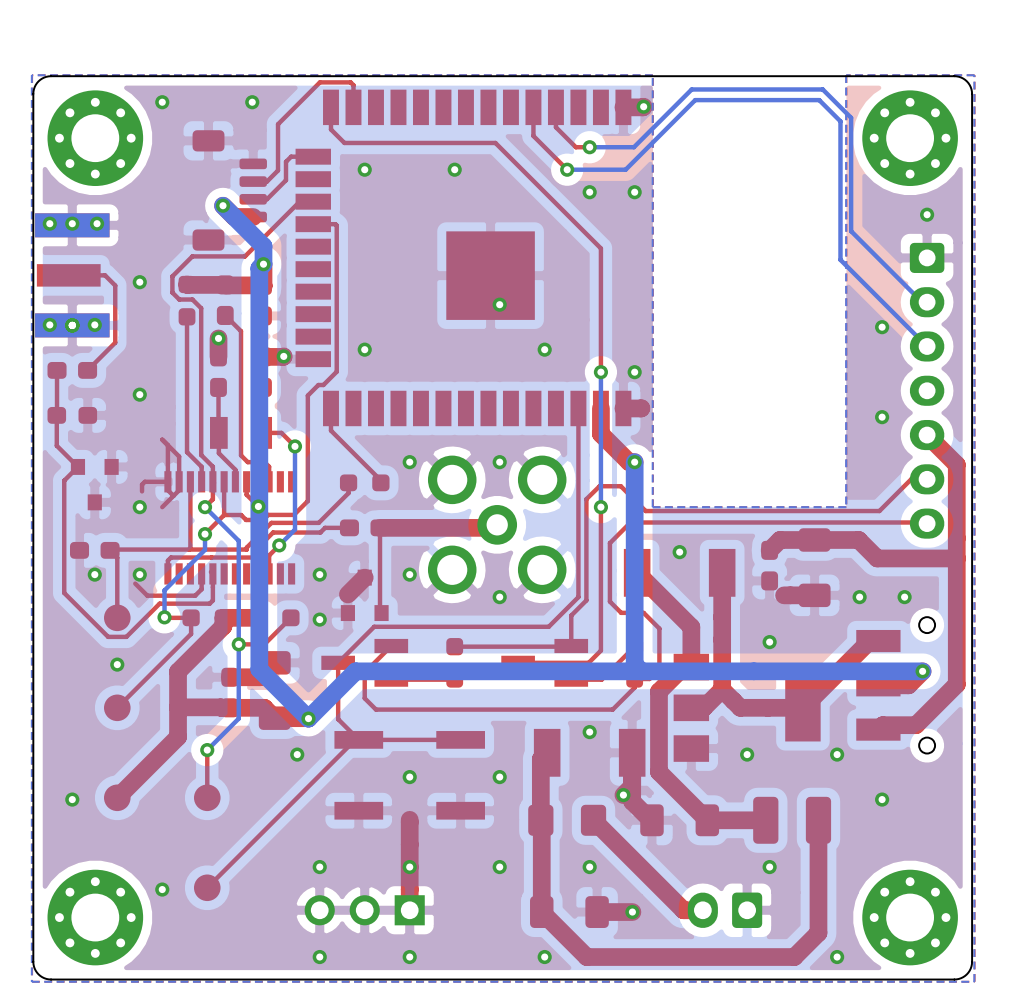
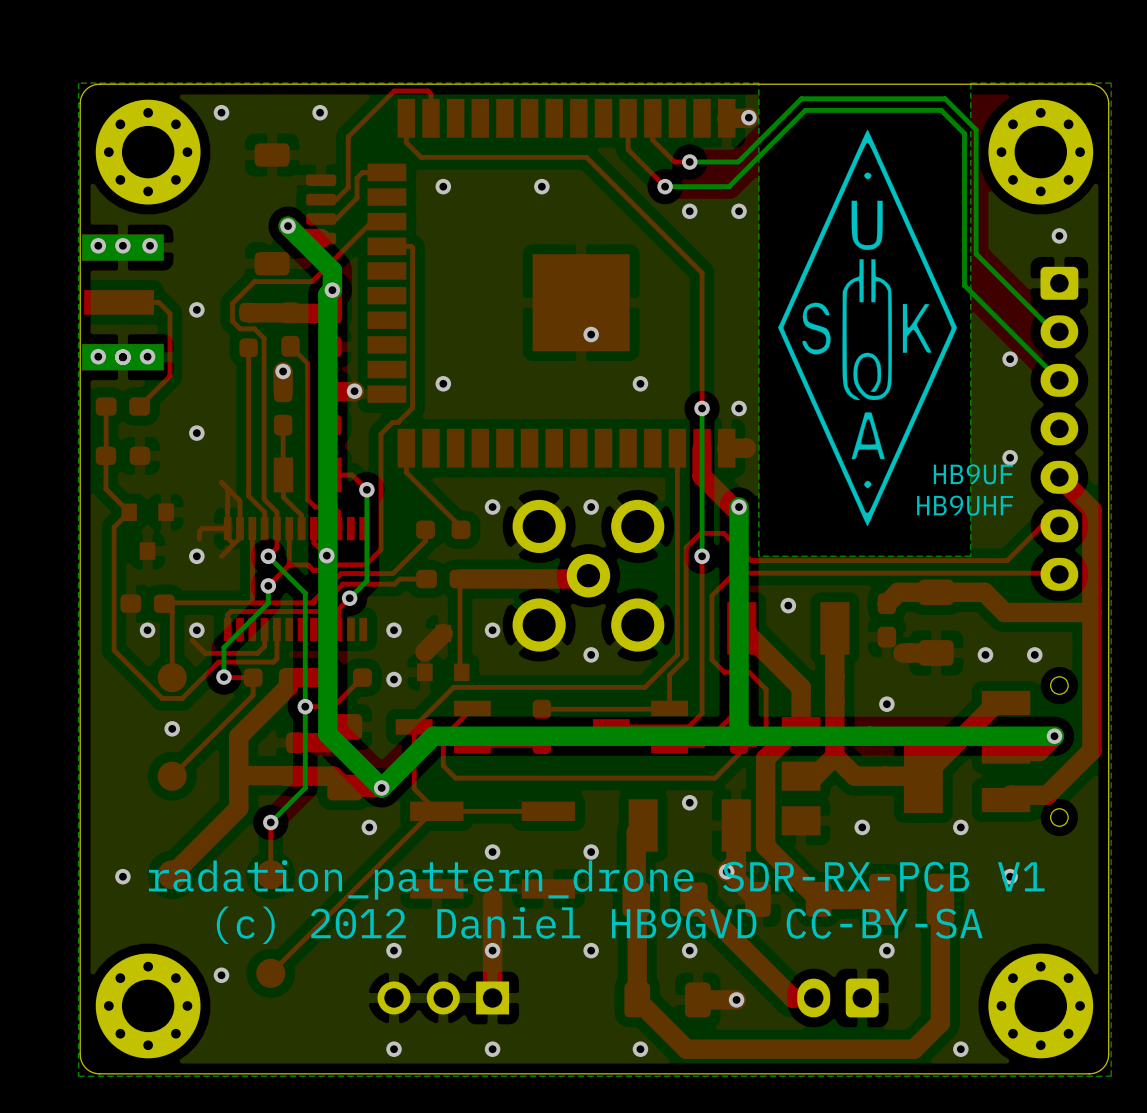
drawing: none -> [778, 129, 957, 527]
text: none -> HB9UF (973, 474)
text: none -> HB9UHF (965, 505)
text: none -> radation_pattern_drone SDR-RX-PCB V1 (596, 879)
text: none -> (c) 2012 Daniel HB9GVD CC-BY-SA (599, 925)

